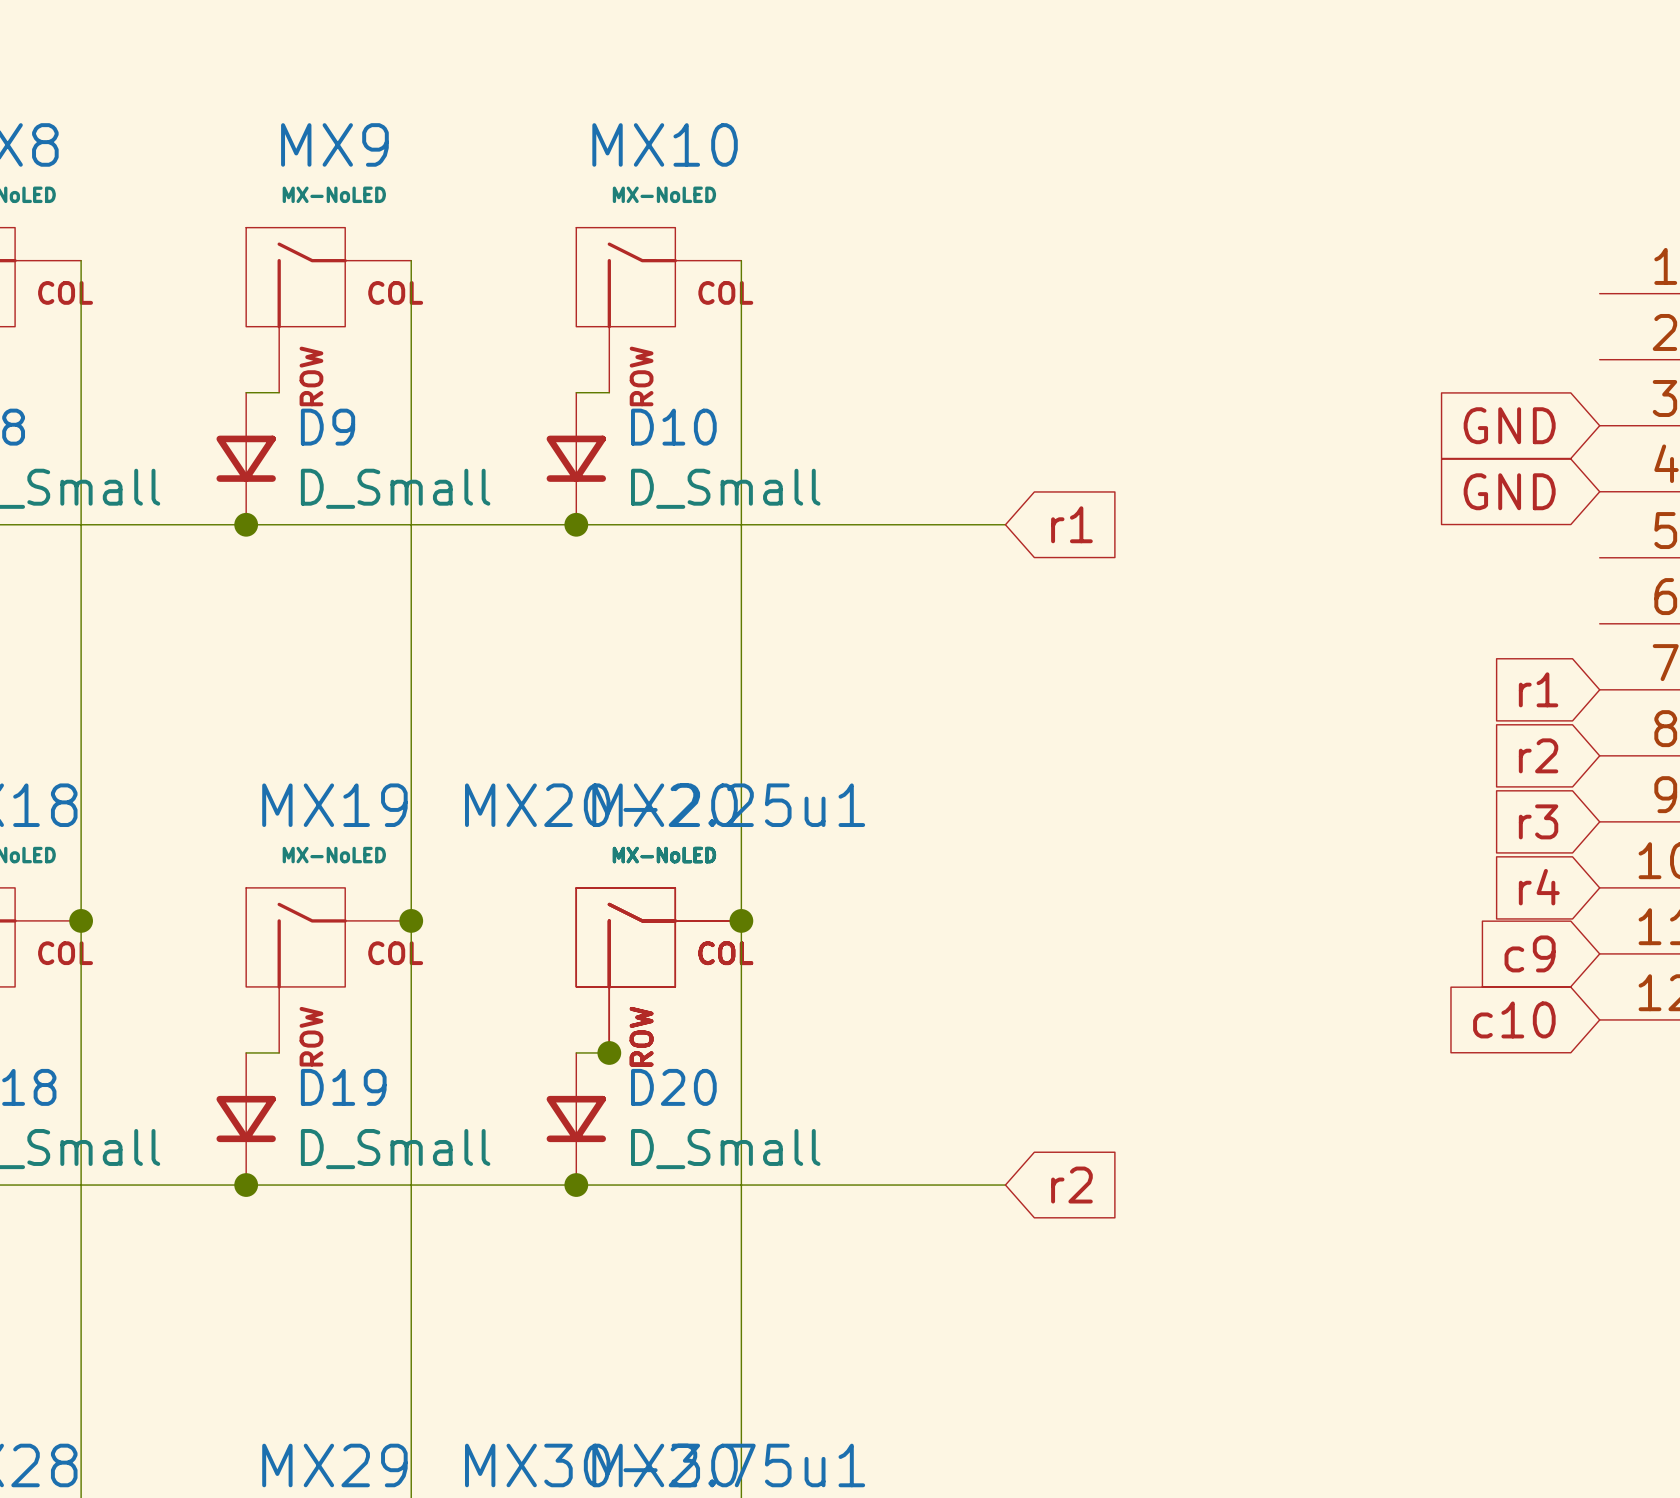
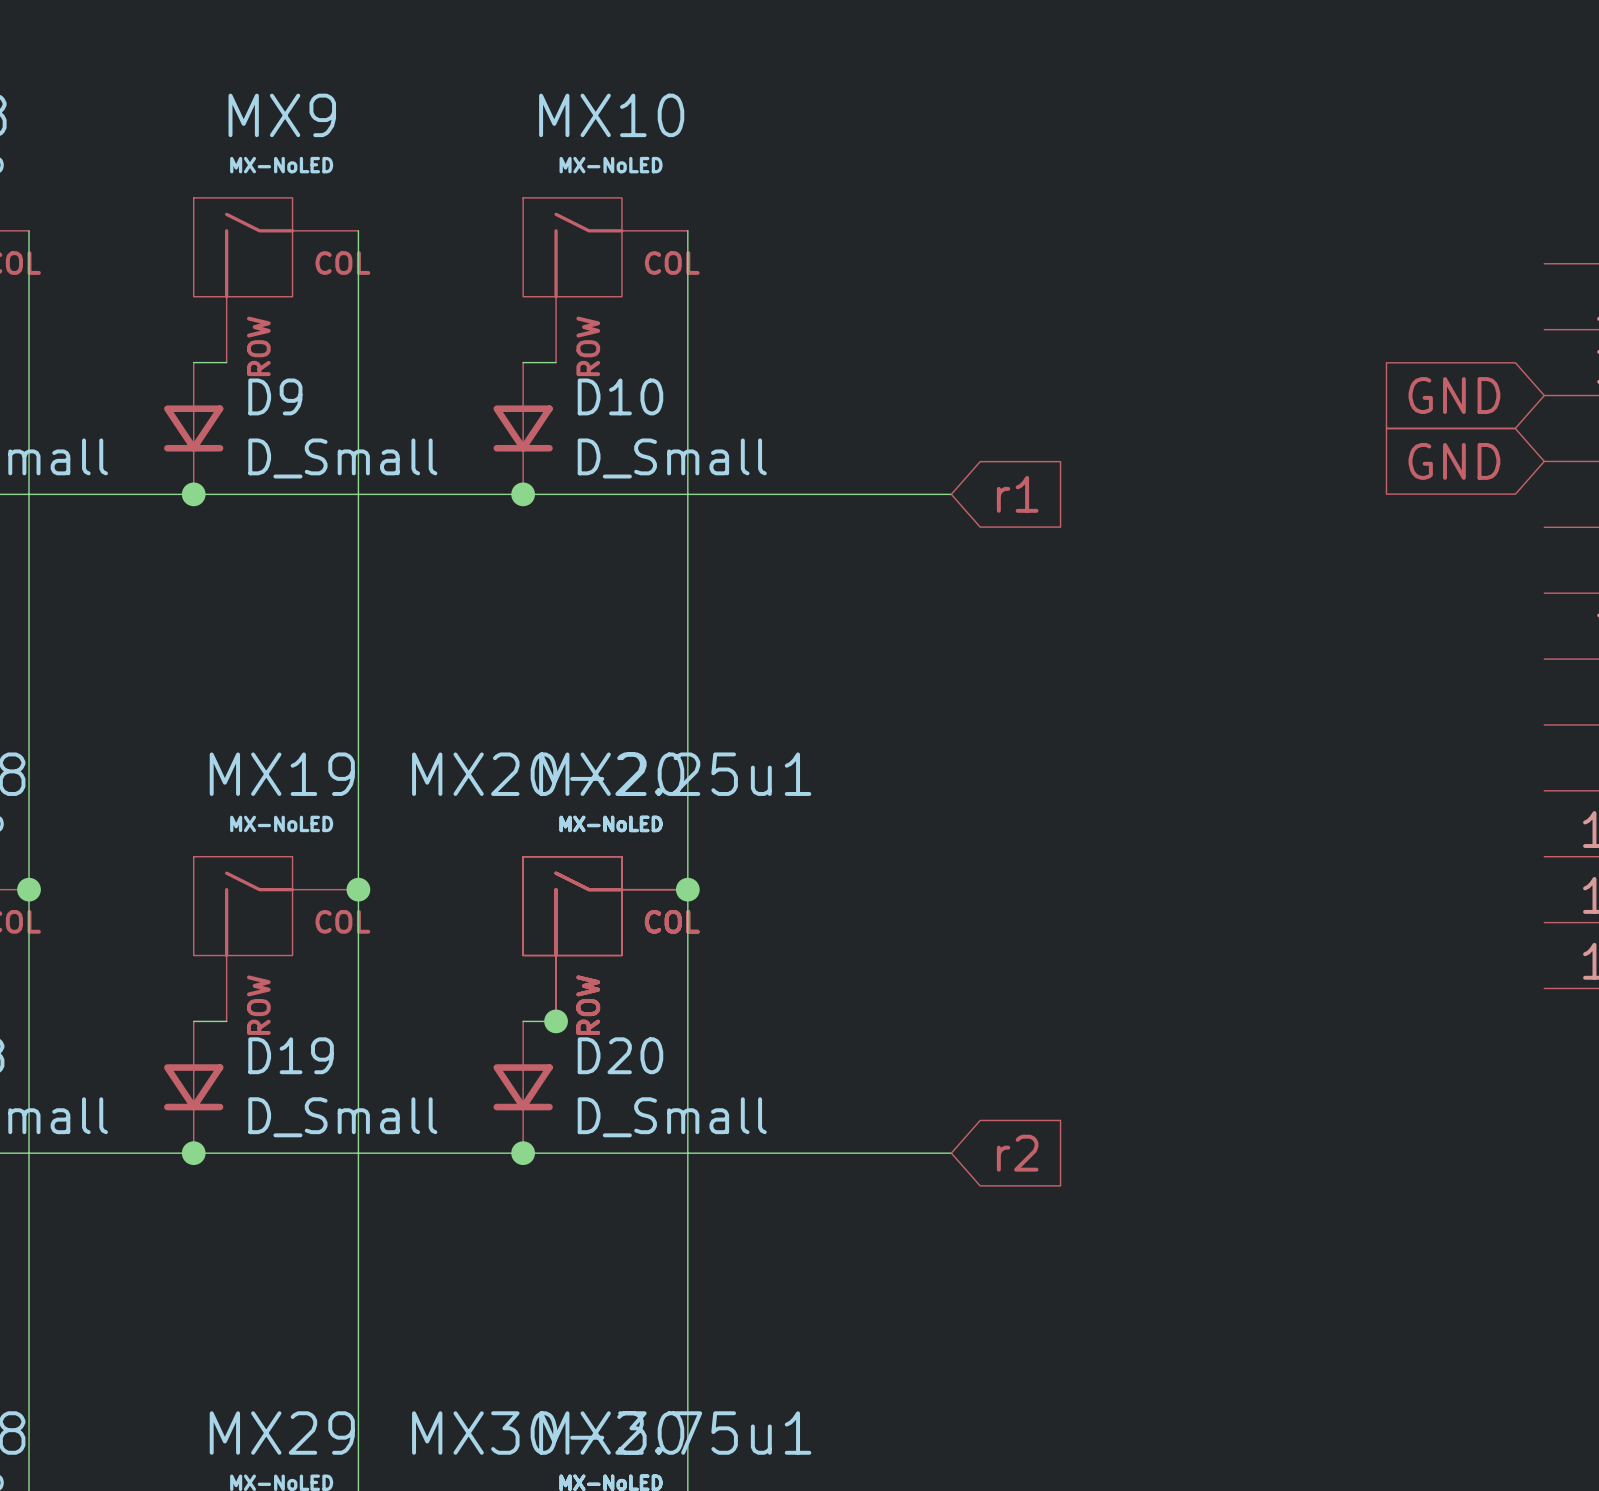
global label: r1 (1538, 689) -> none
global label: r2 (1538, 755) -> none
global label: r3 (1538, 821) -> none
global label: r4 (1539, 887) -> none
global label: c9 (1530, 953) -> none
global label: c10 (1514, 1019) -> none

